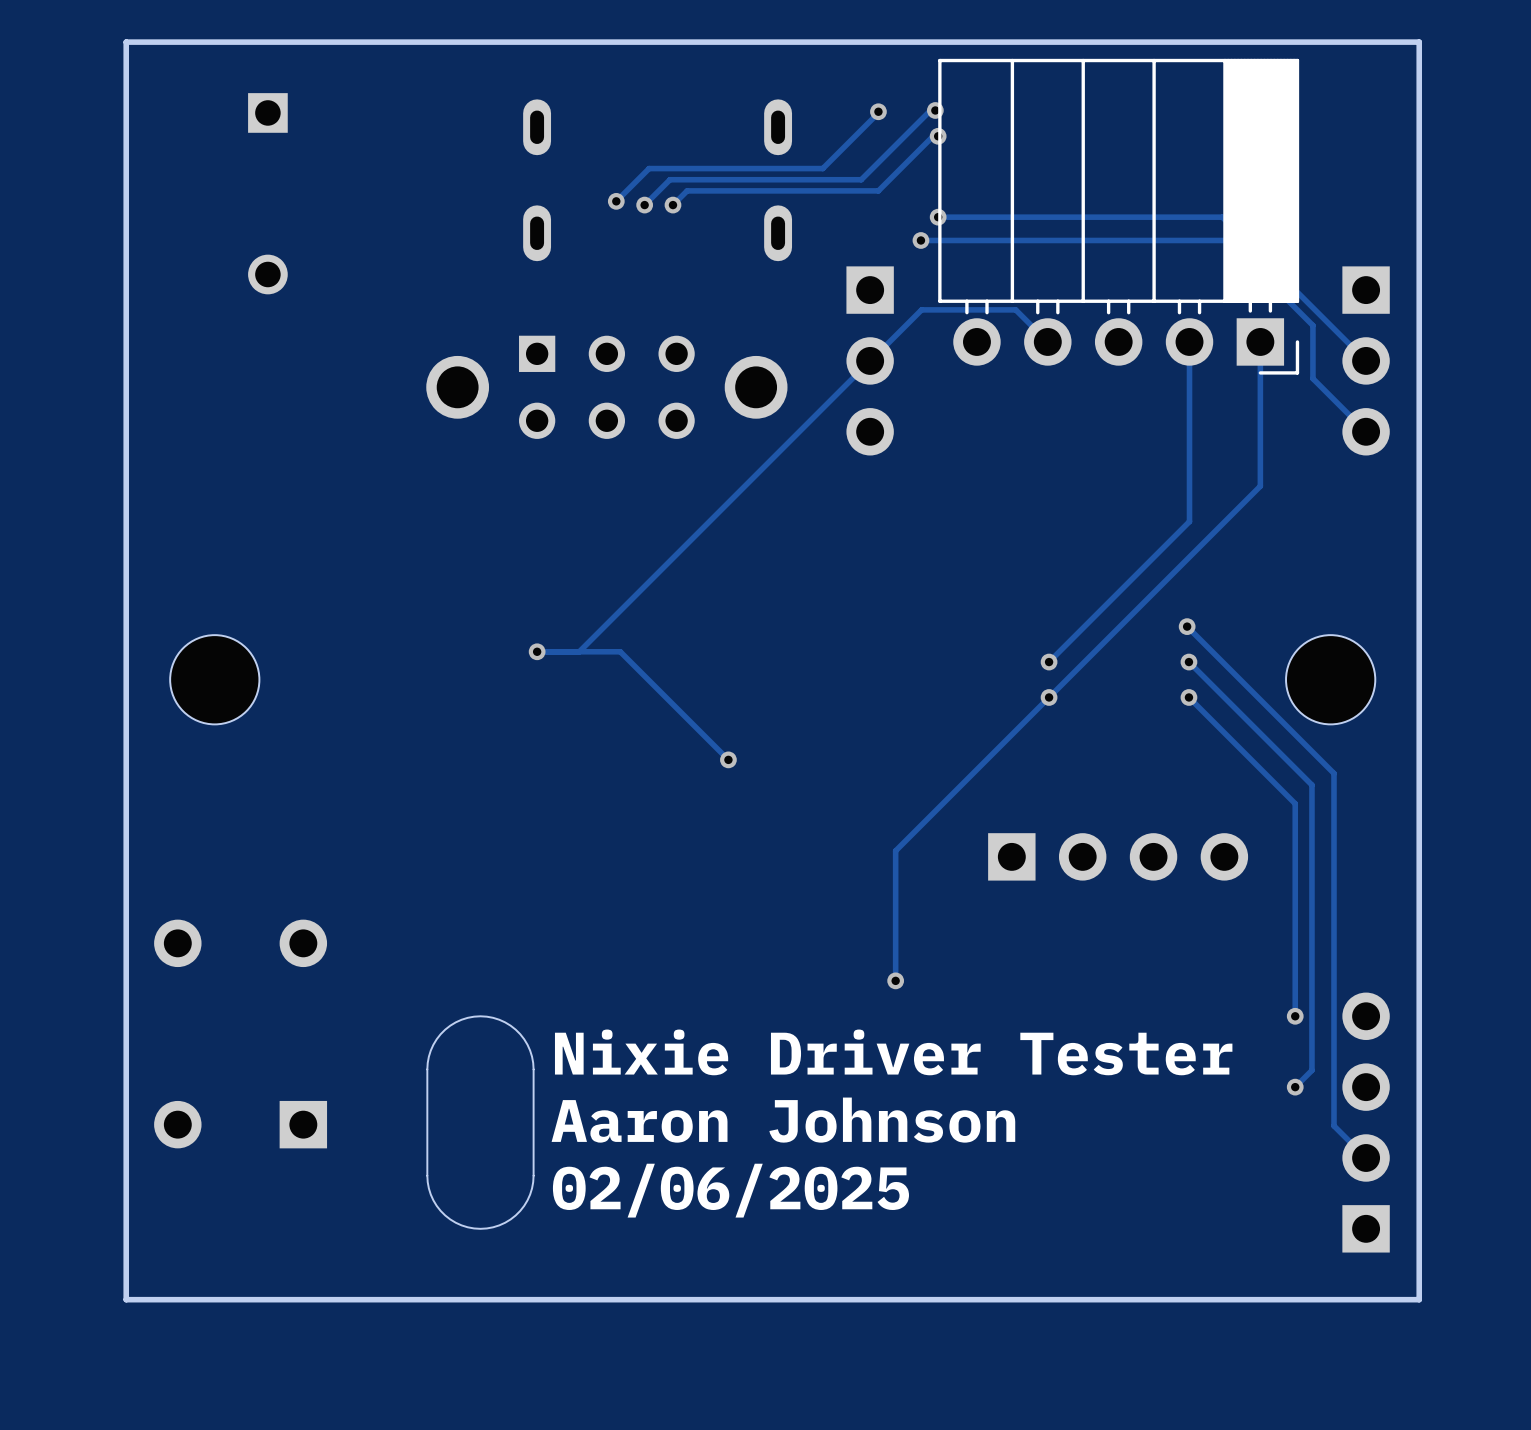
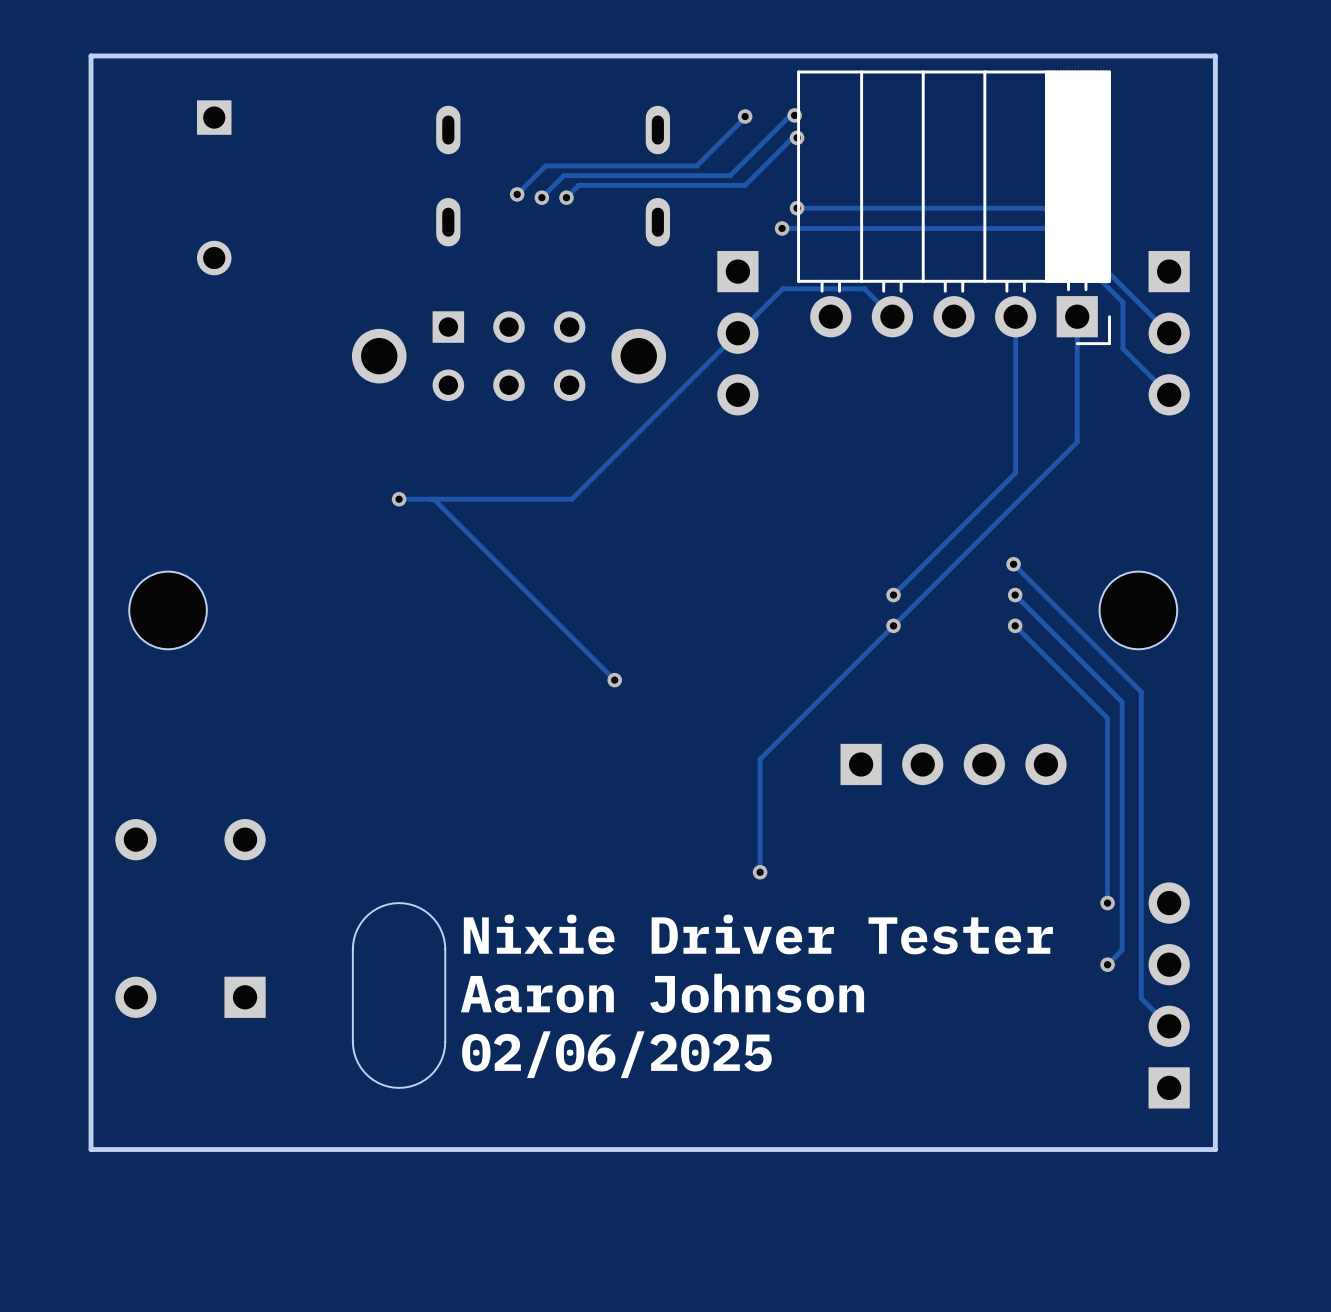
track: (679, 551) (579, 651) -> (571, 499) (399, 499)
via position: (537, 651) -> (399, 499)
track: (620, 651) (537, 651) -> (520, 586) (433, 499)

